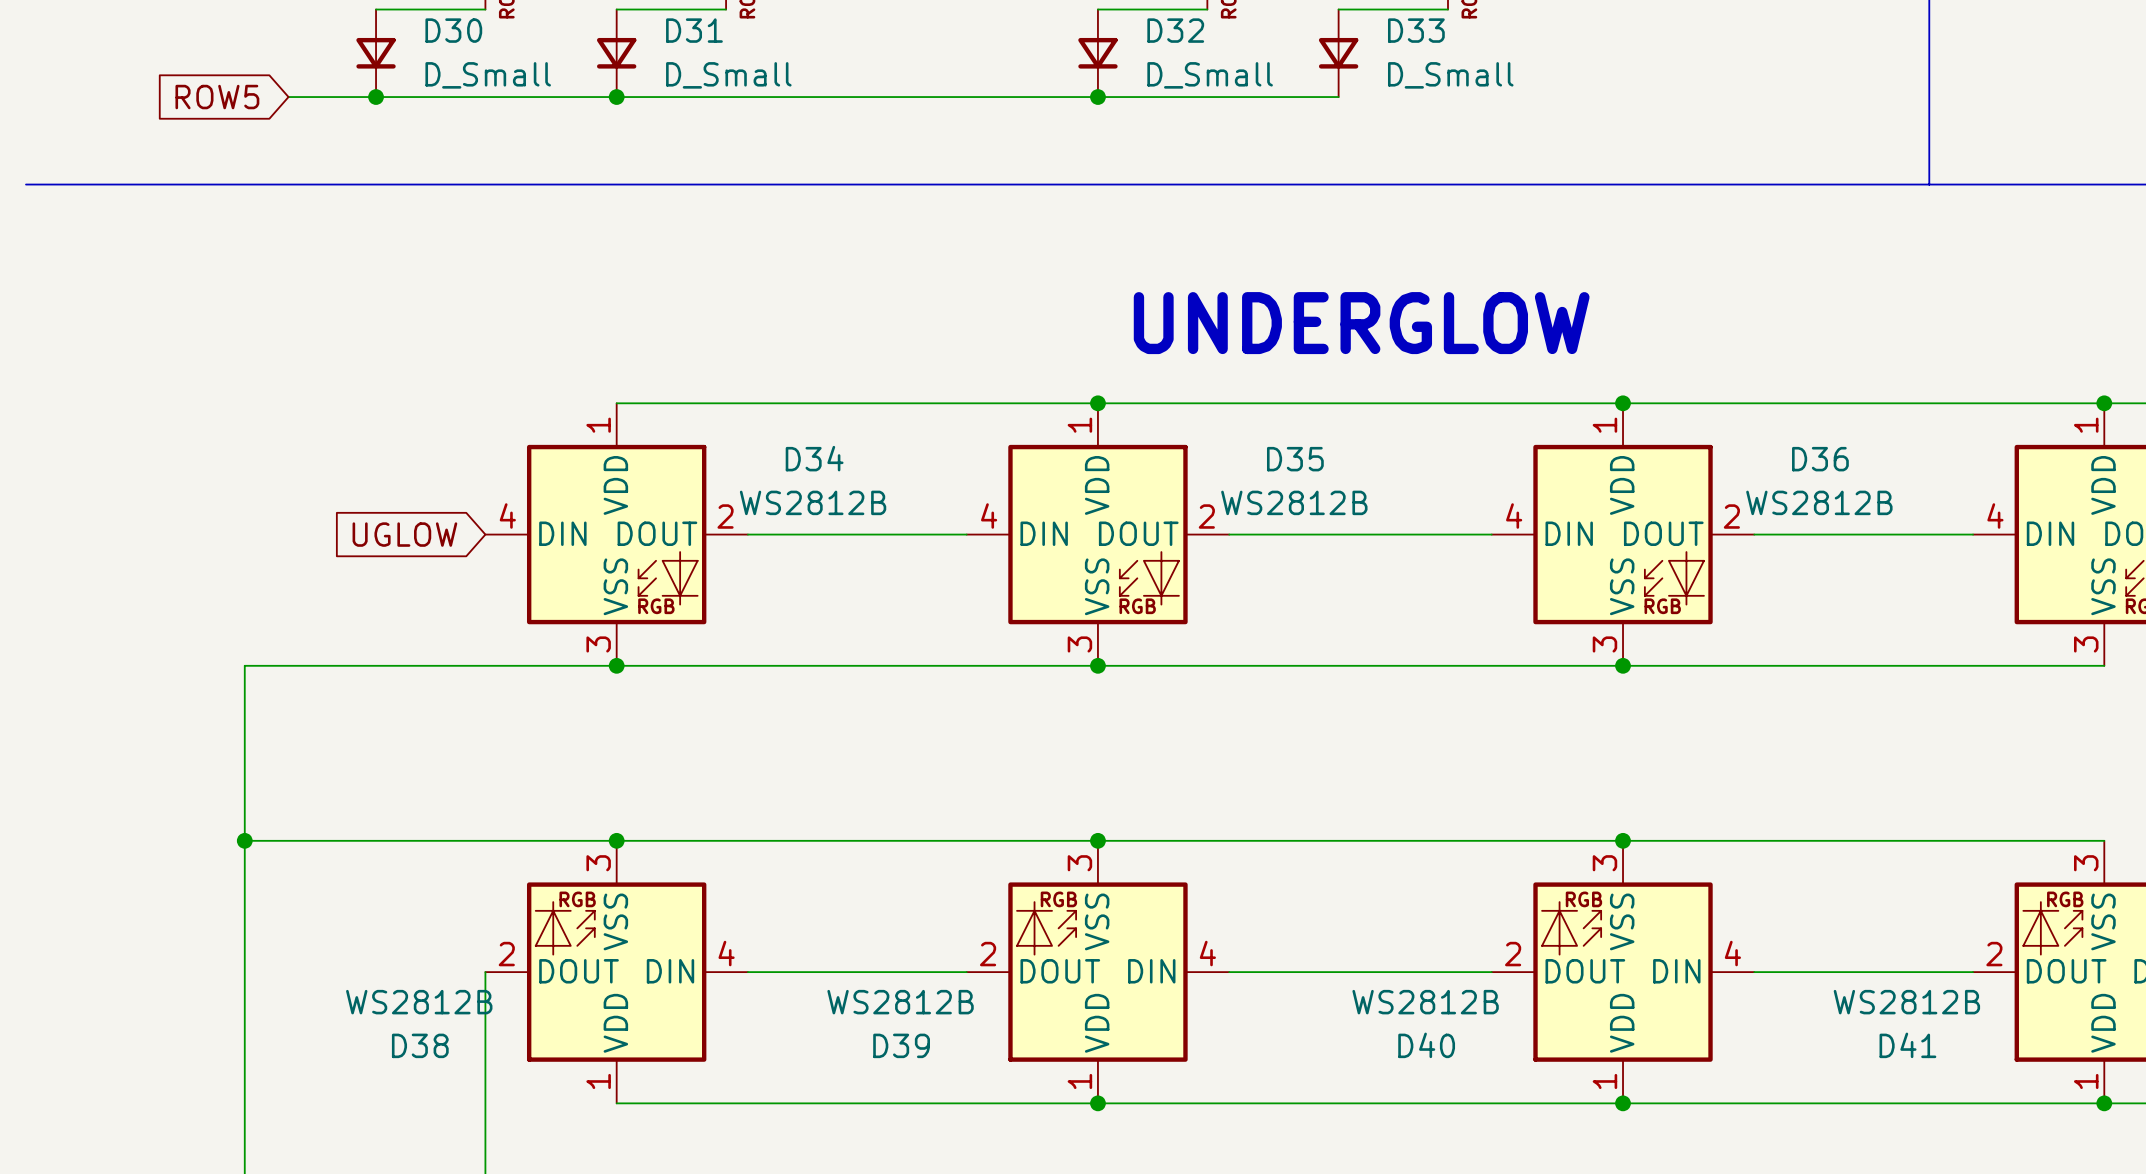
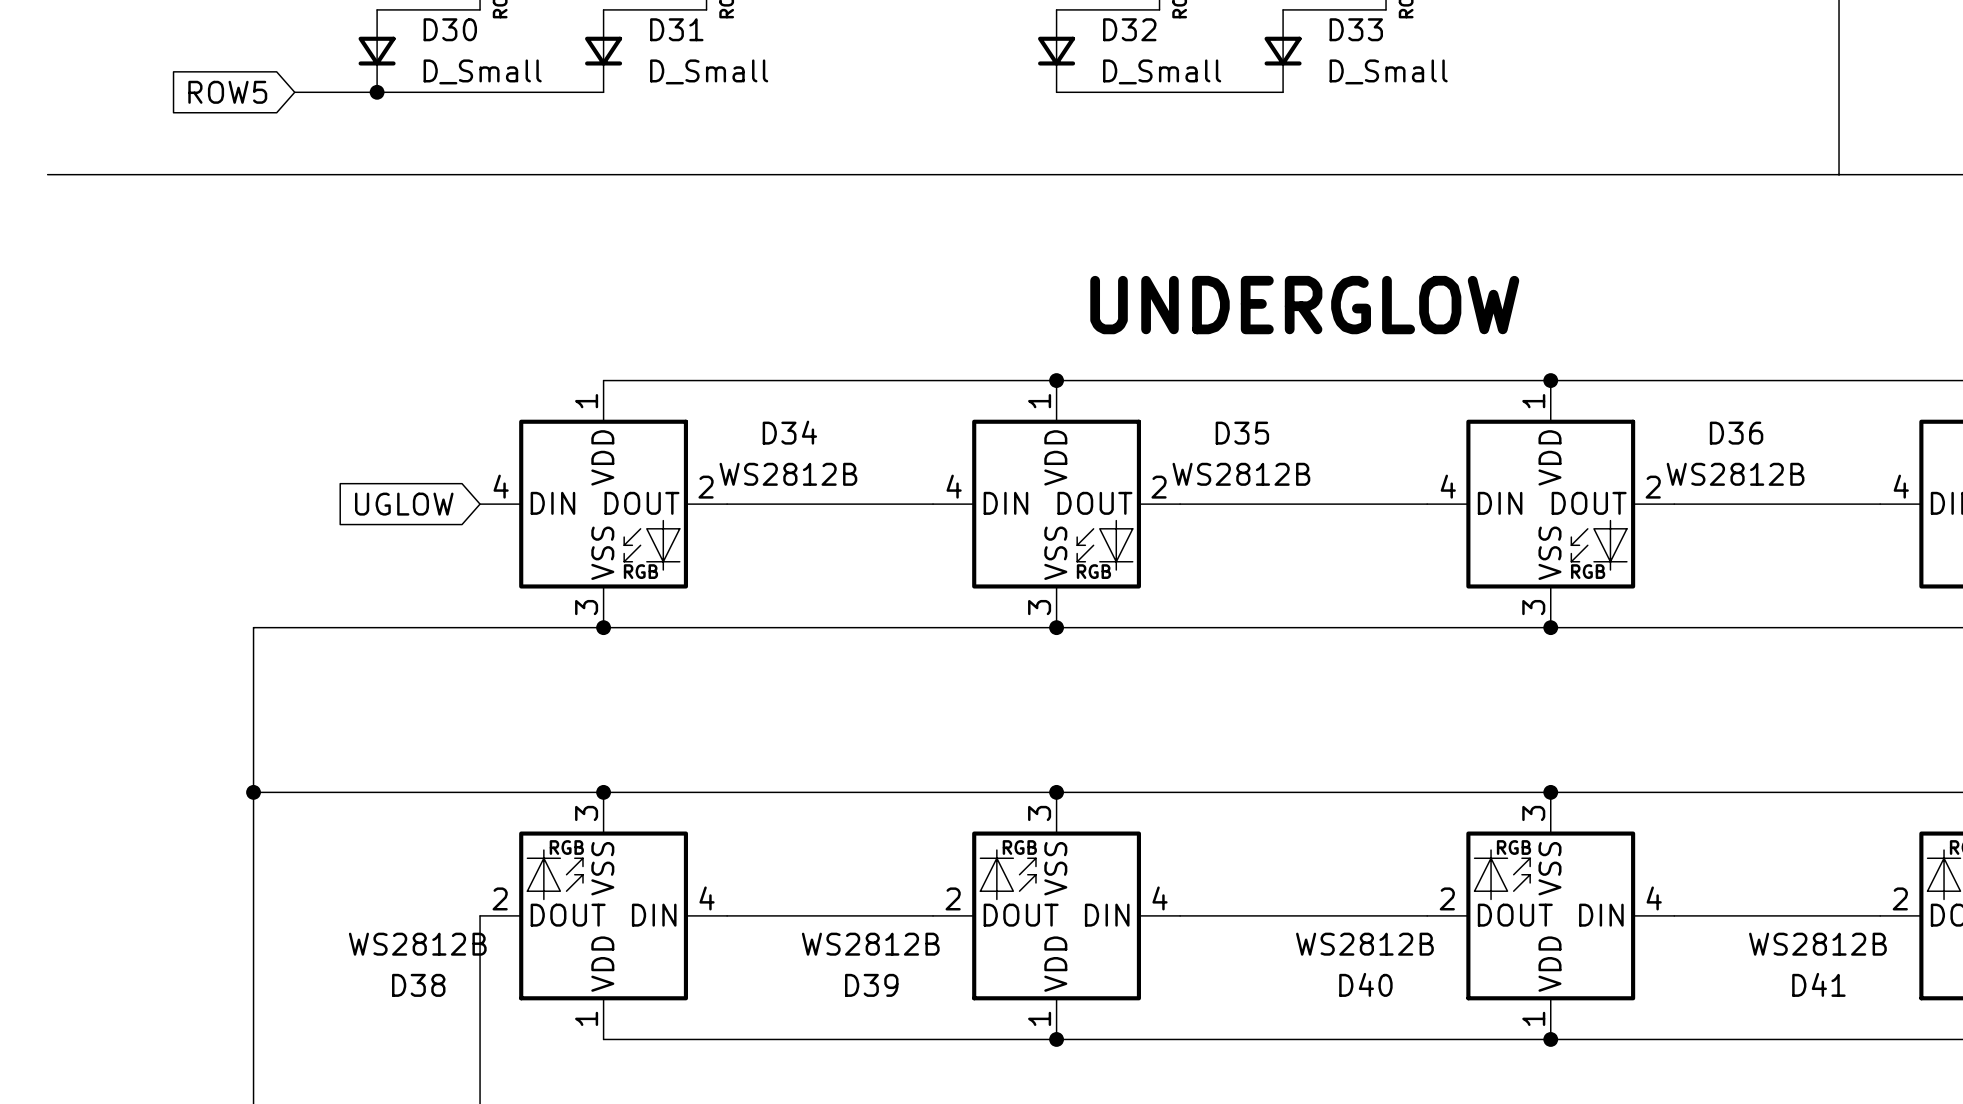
wire: (616, 97) (1097, 97) -> none
junction: (616, 97) -> none
junction: (1097, 97) -> none

